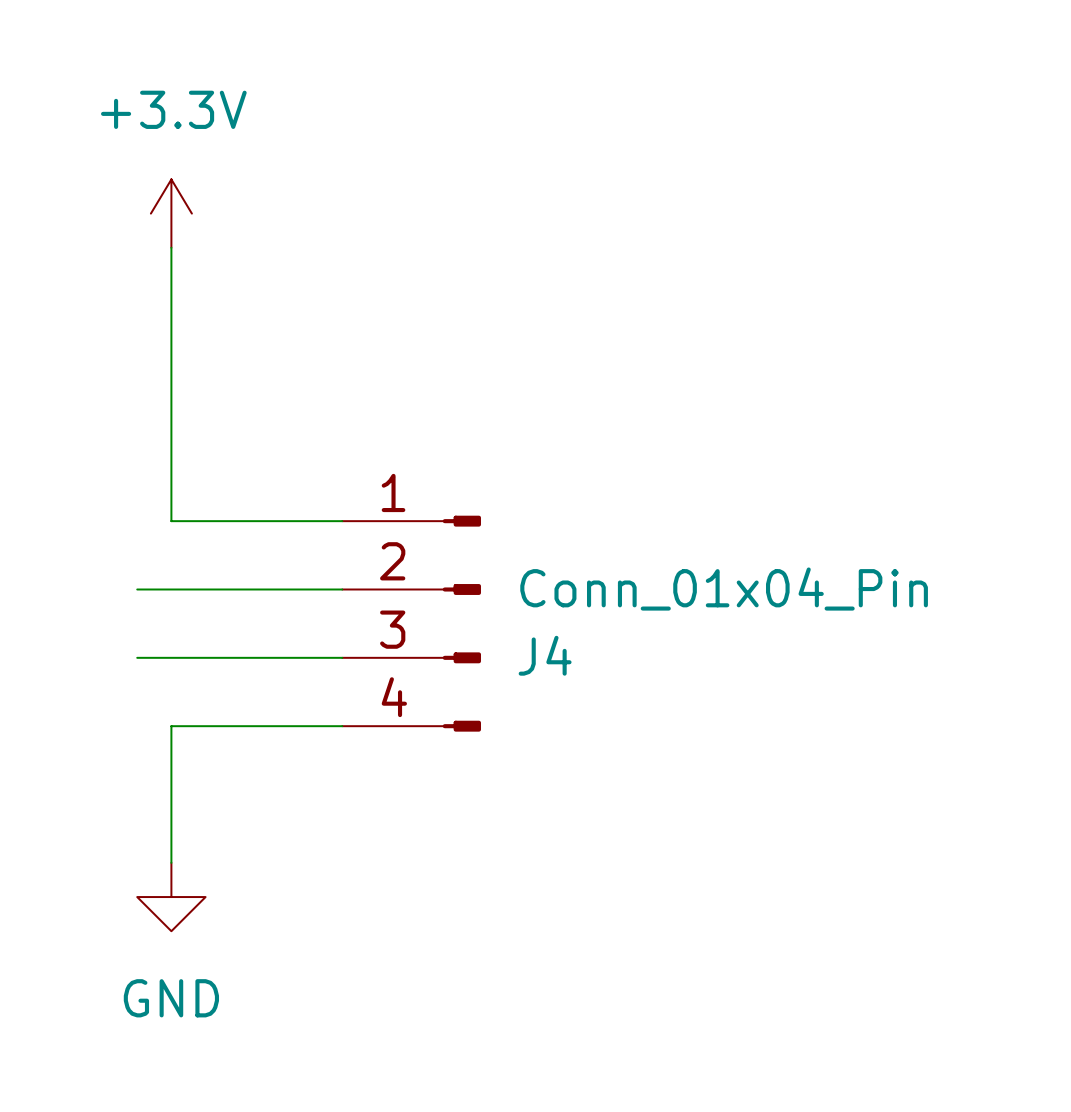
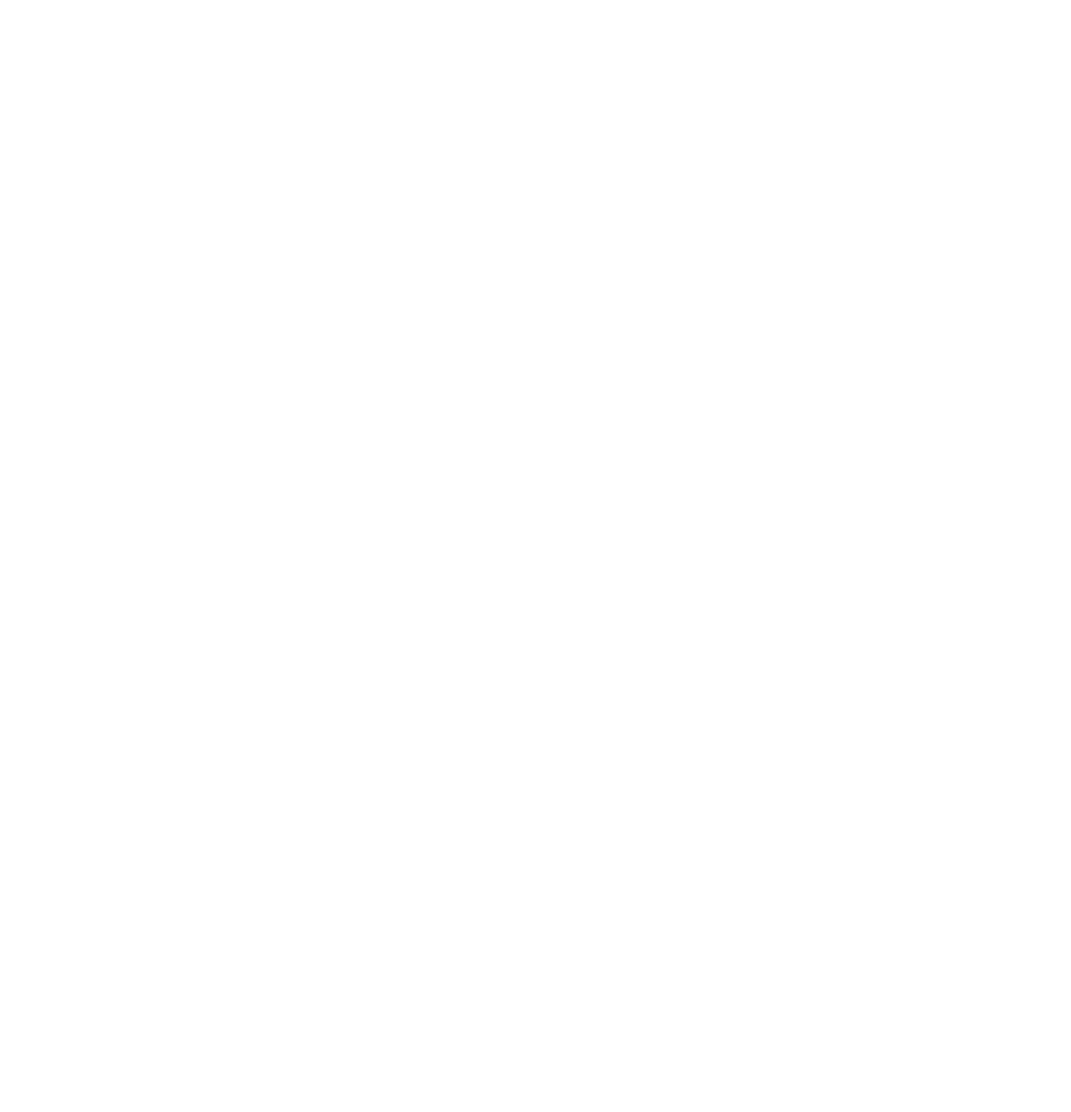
power symbol: +3.3V (171, 213) -> none
wire: (171, 247) (171, 521) (342, 521) -> none
wire: (137, 589) (342, 589) -> none
J4: Conn_01x04_Pin (411, 623) -> none
wire: (137, 657) (342, 657) -> none
wire: (342, 726) (171, 726) (171, 862) -> none
power symbol: GND (171, 897) -> none

